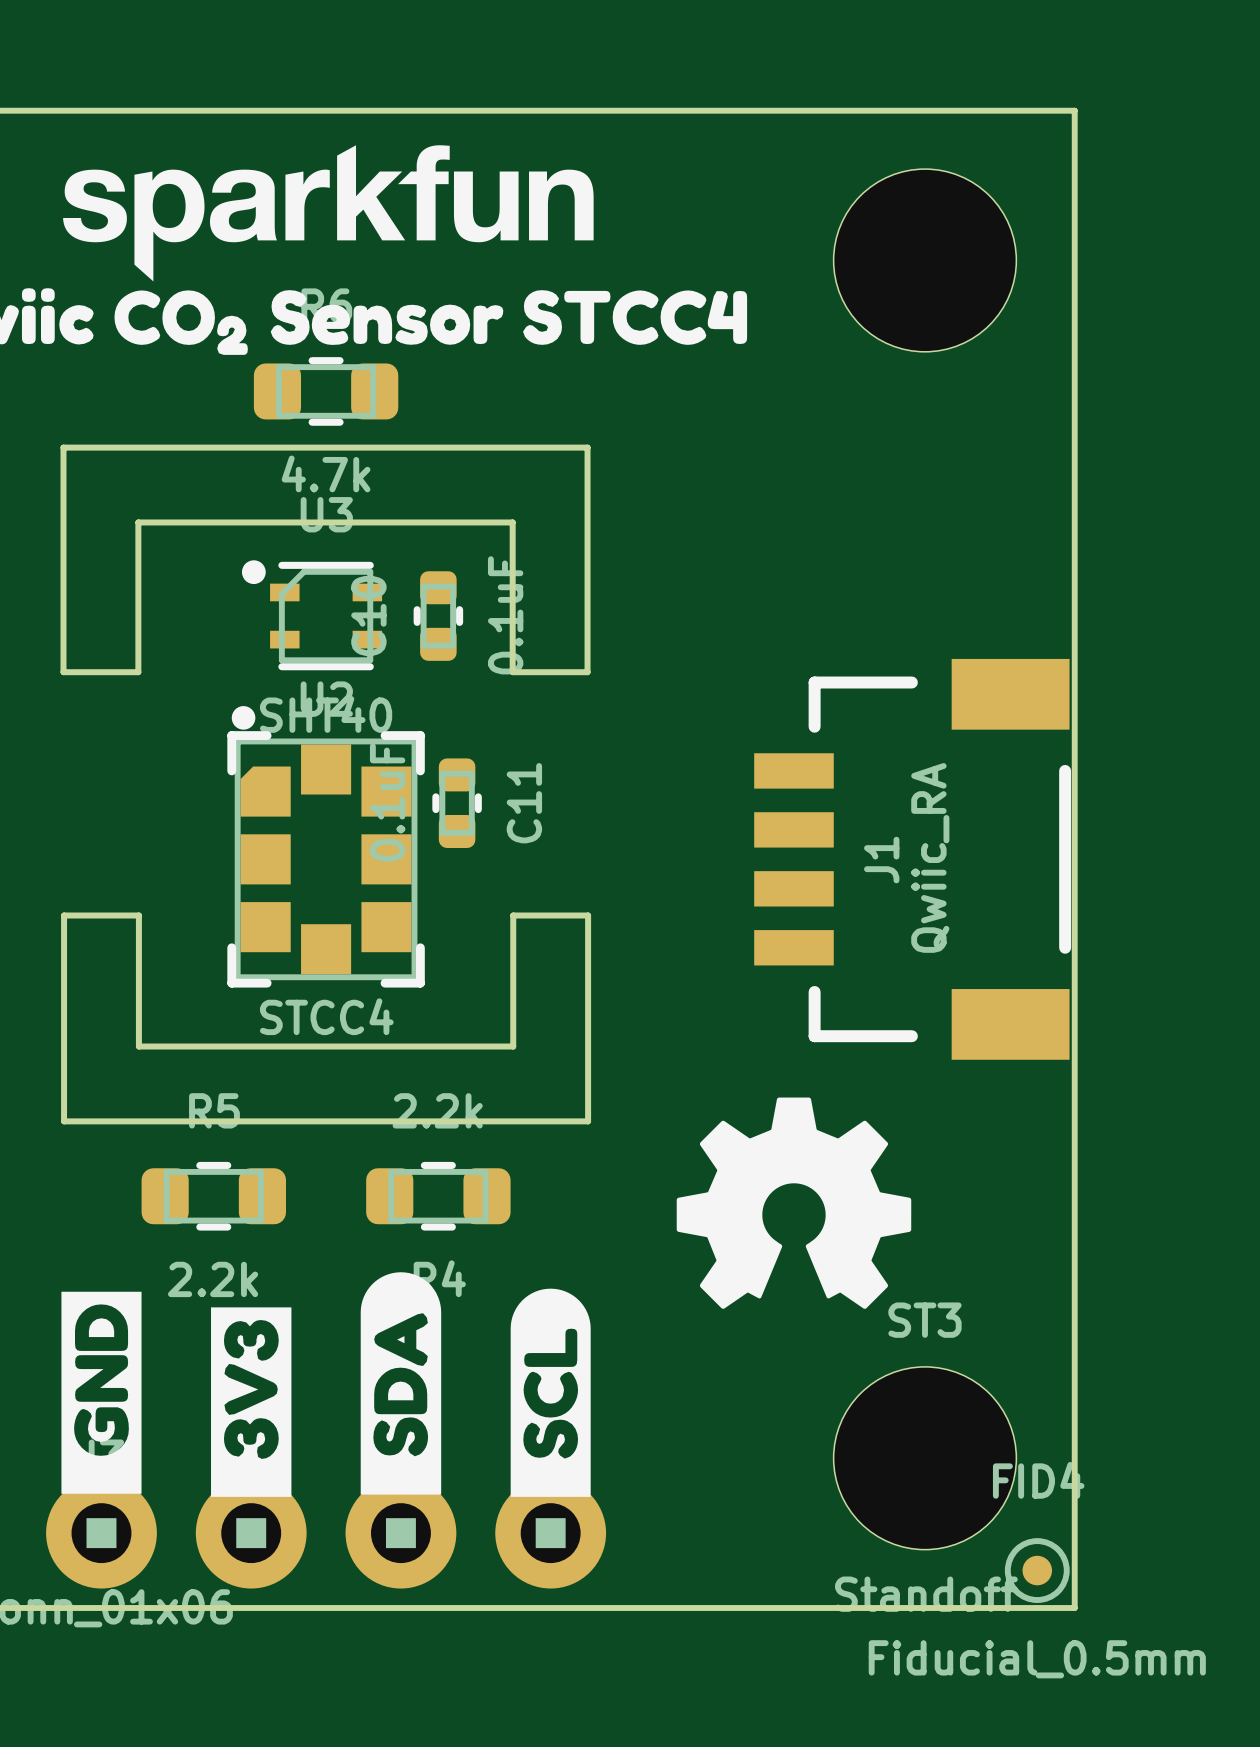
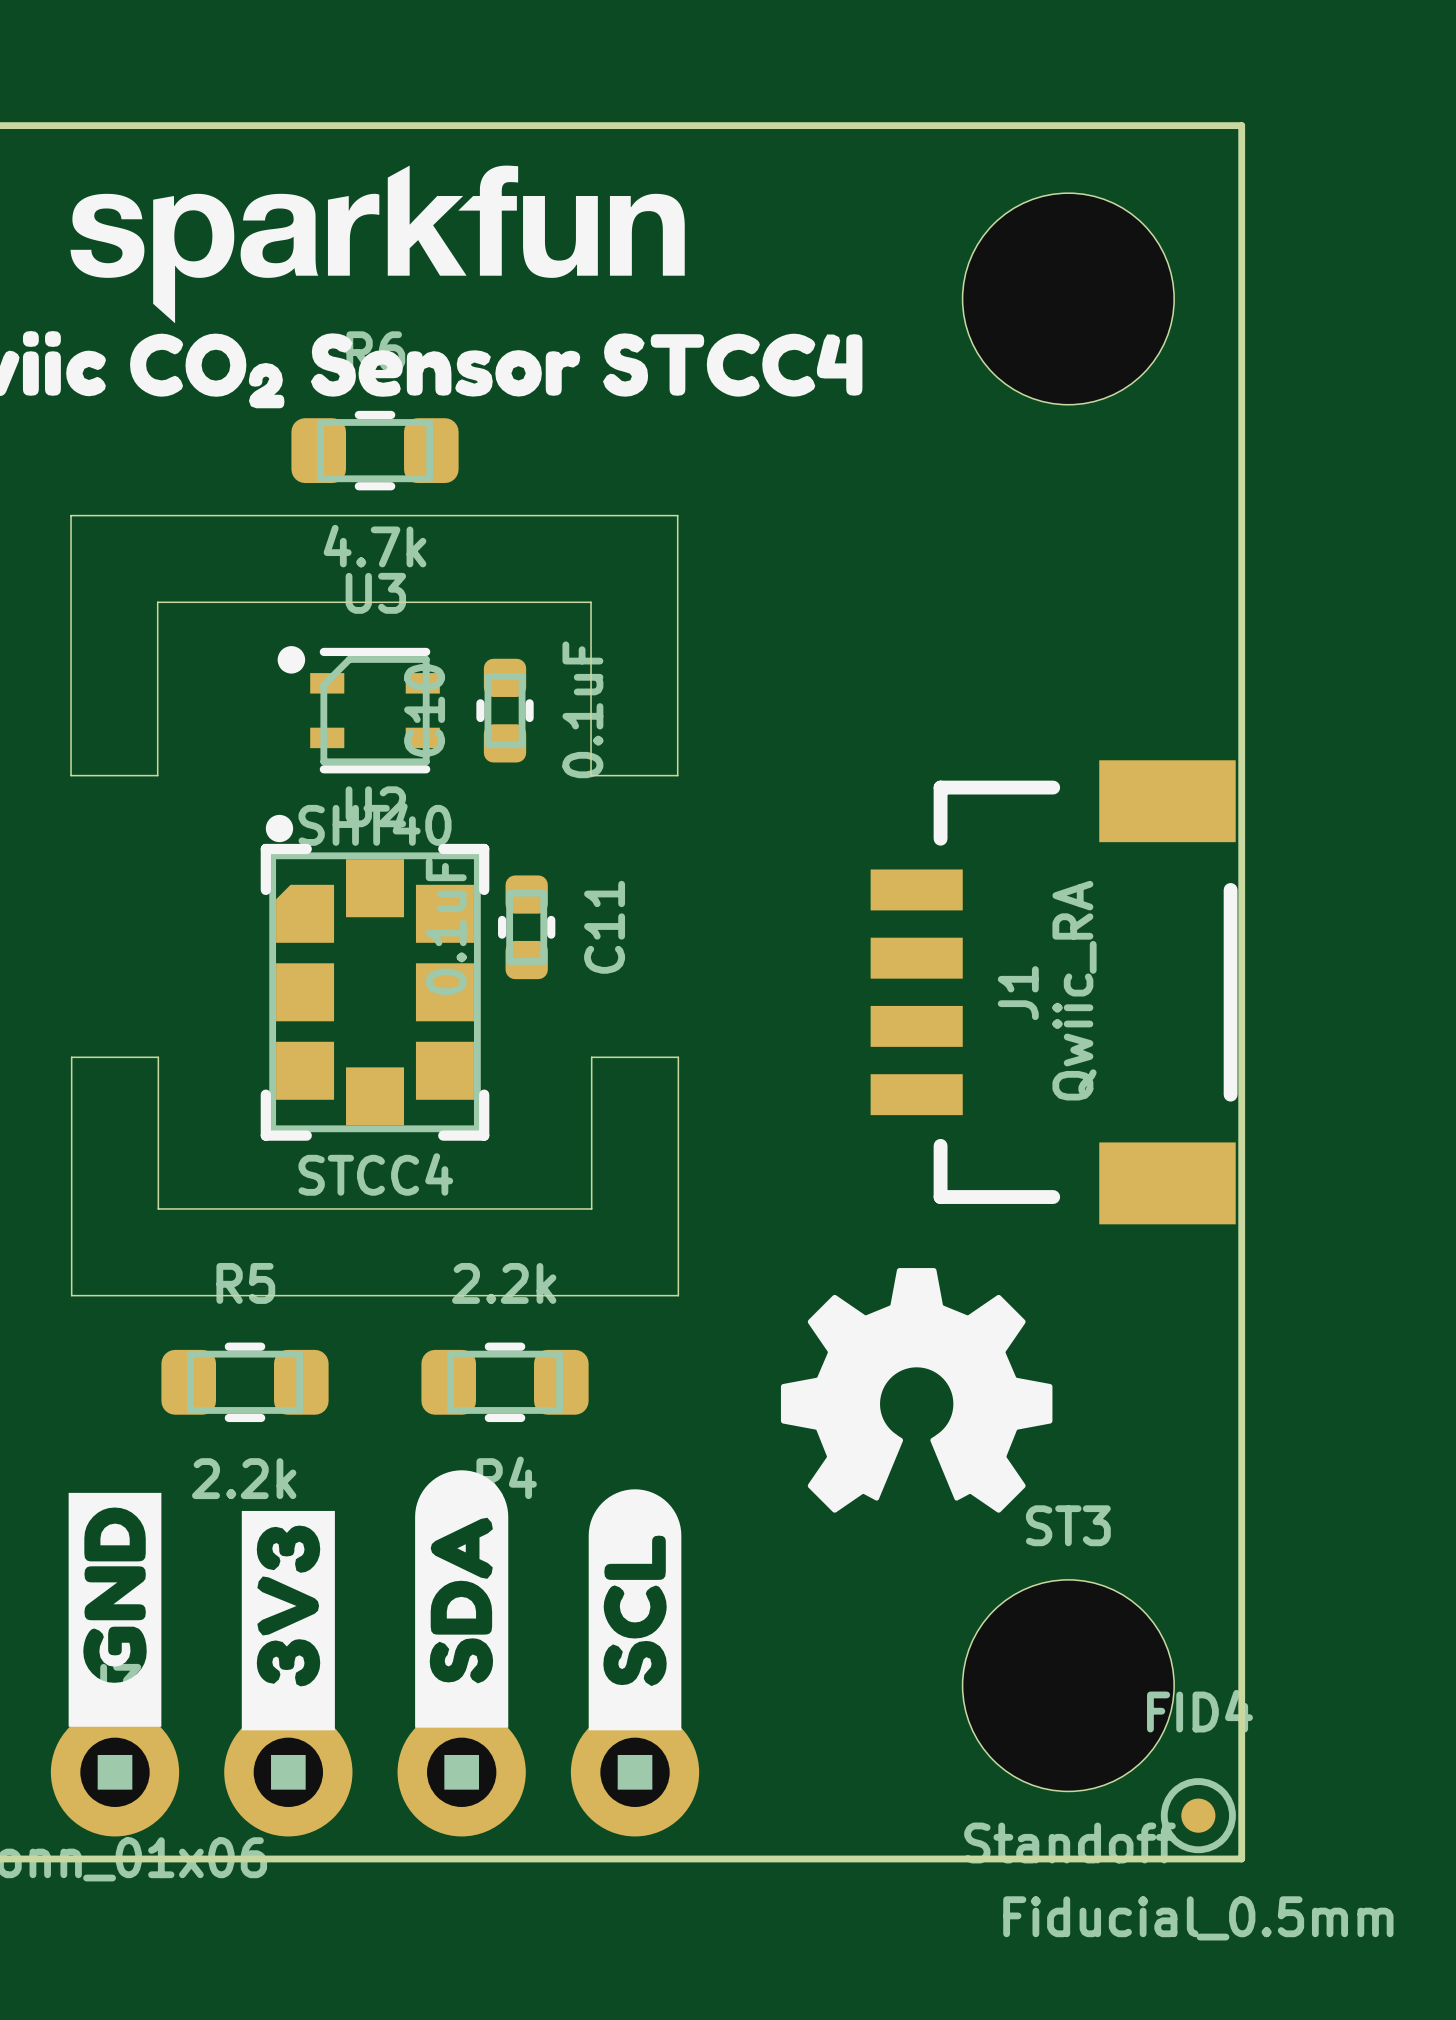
board edge width: thick (63, 447) (63, 672) (138, 672) (138, 522) (512, 522) (512, 672) (587, 672) (587, 447) (63, 447) -> thin (71, 515) (71, 775) (157, 775) (157, 602) (591, 602) (591, 775) (677, 775) (677, 515) (71, 515)
board edge width: thick (64, 915) (64, 1121) (588, 1121) (588, 915) (513, 915) (513, 1046) (138, 1046) (138, 915) (64, 915) -> thin (71, 1057) (71, 1295) (678, 1295) (678, 1057) (591, 1057) (591, 1208) (158, 1208) (158, 1057) (71, 1057)

